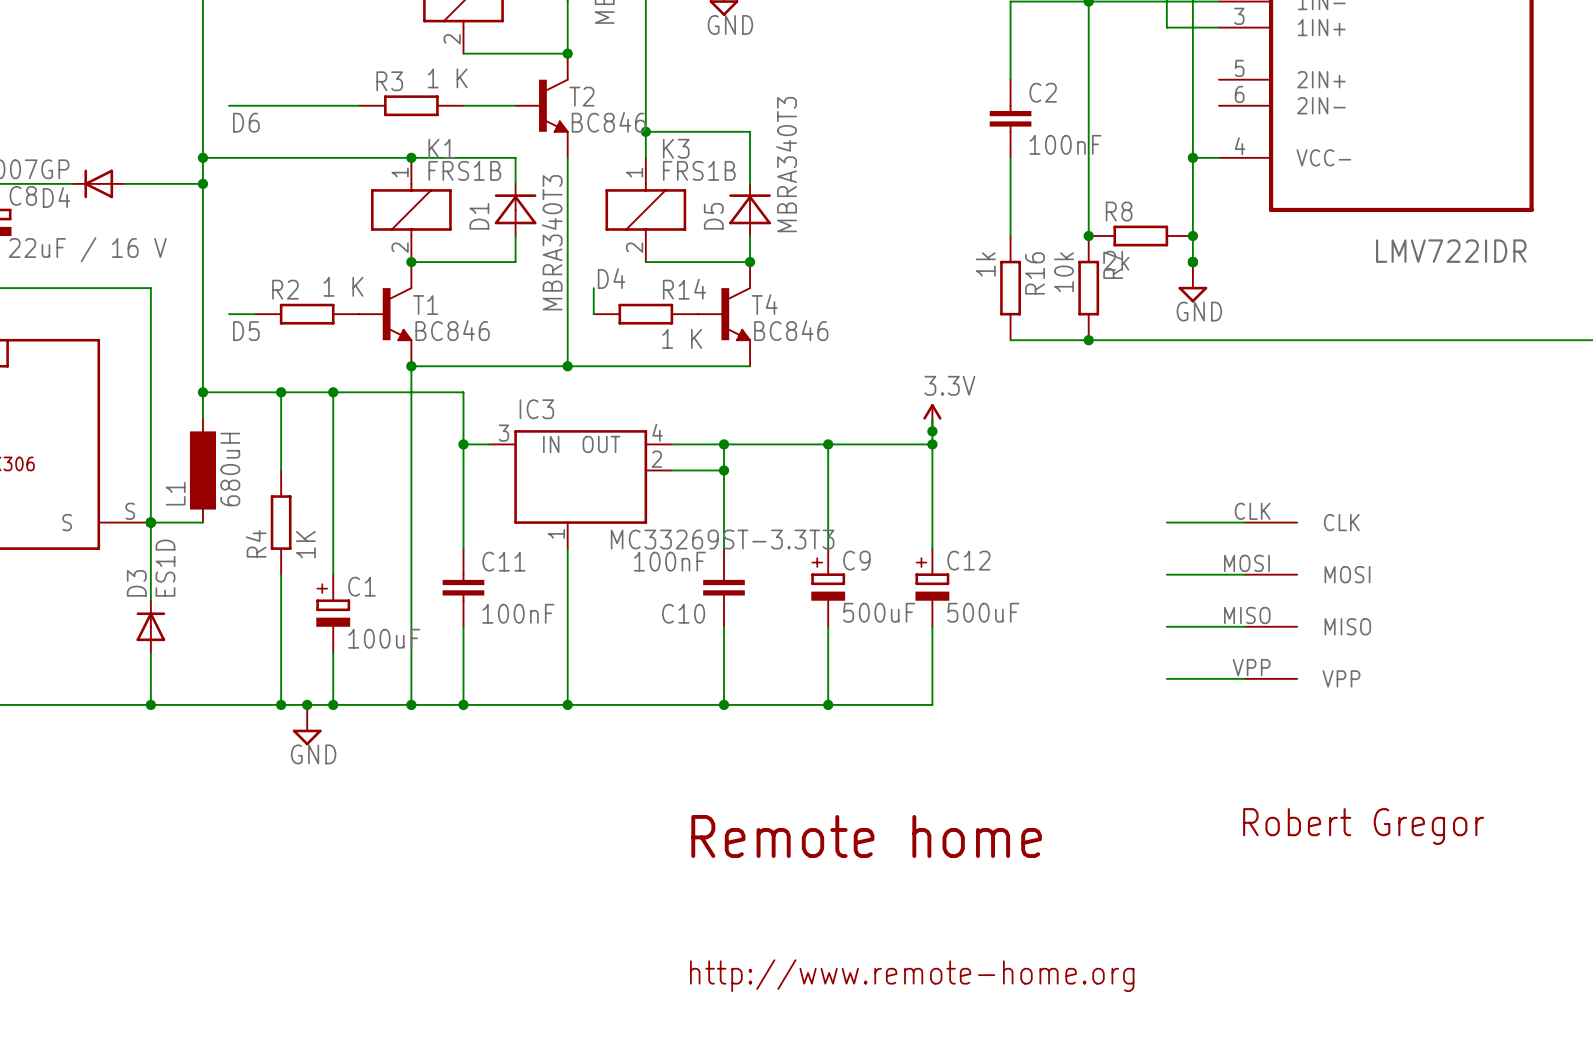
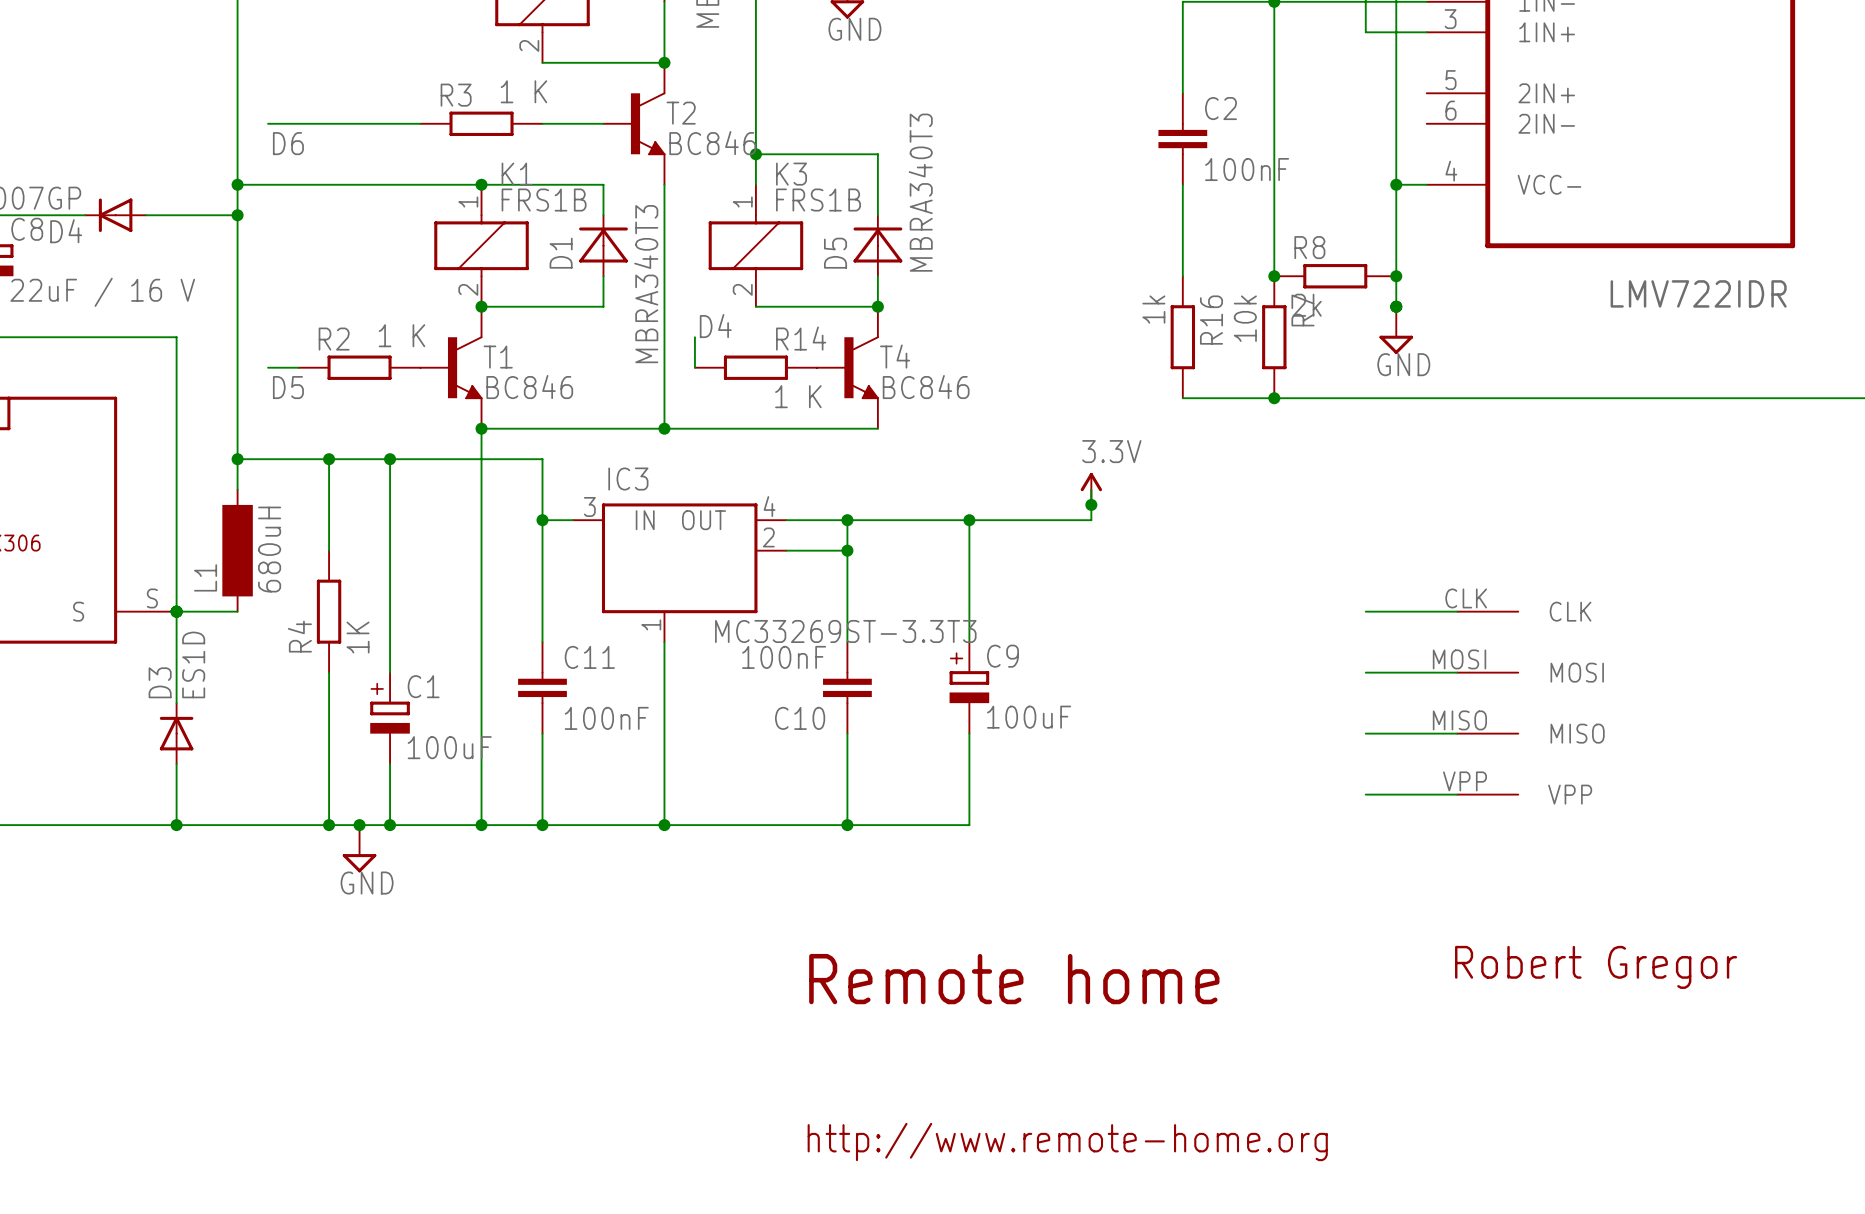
wire: (932, 444) (932, 548) -> none
junction: (932, 444) -> none
C12: 500uF (932, 587) -> none
C9 value: 500uF (879, 612) -> 100uF (1029, 717)
wire: (932, 626) (932, 704) (828, 704) -> none
junction: (828, 704) -> none

